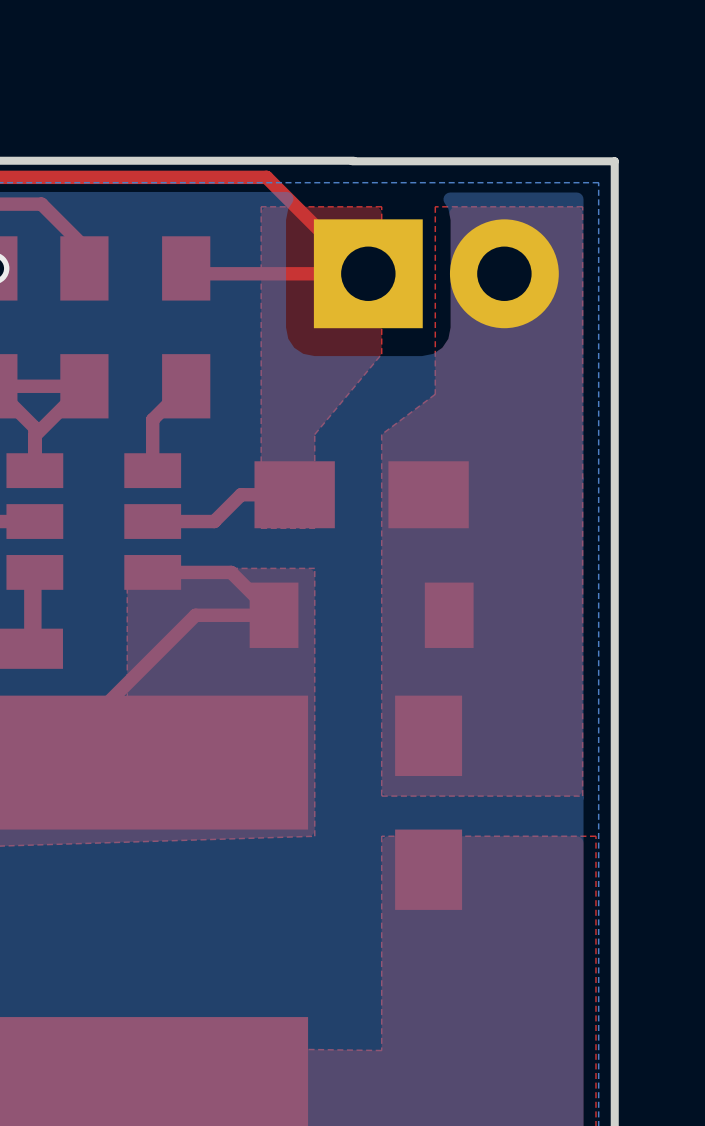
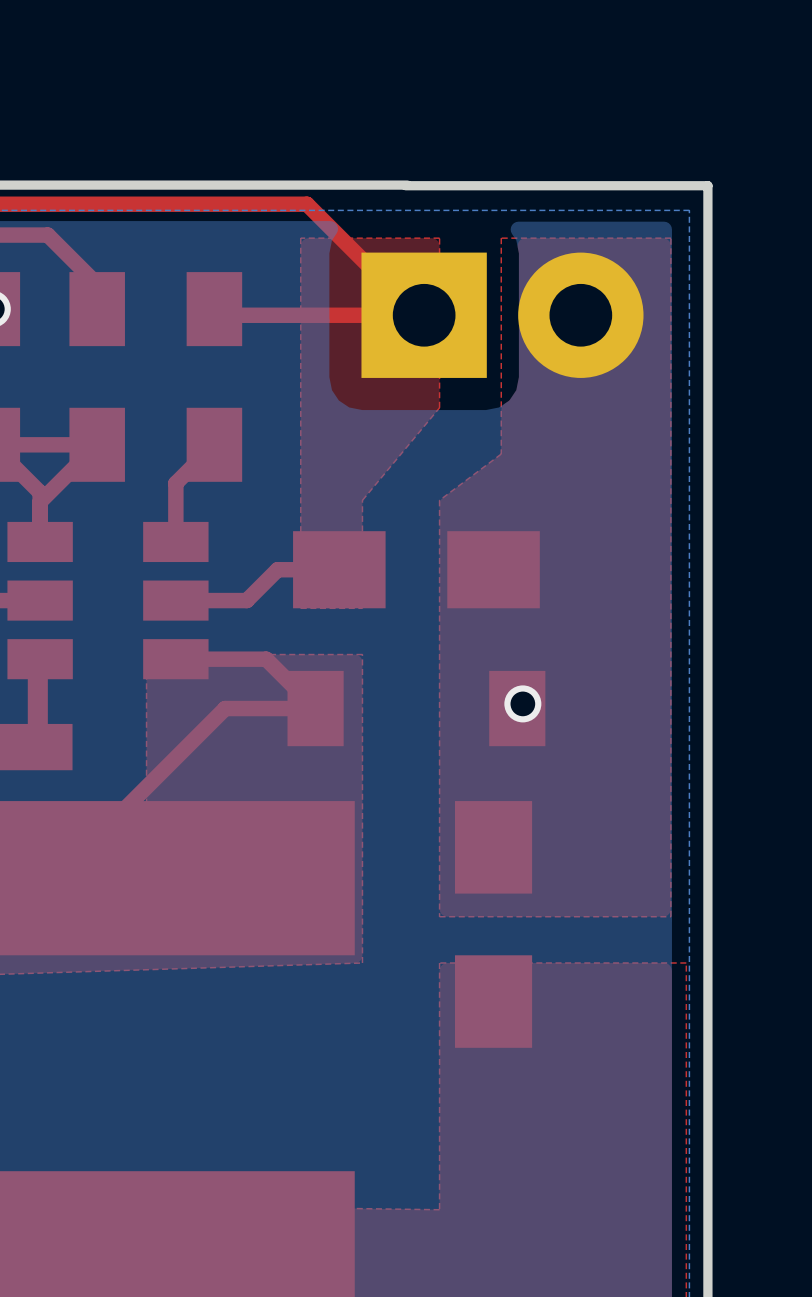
via: none -> (522, 703)

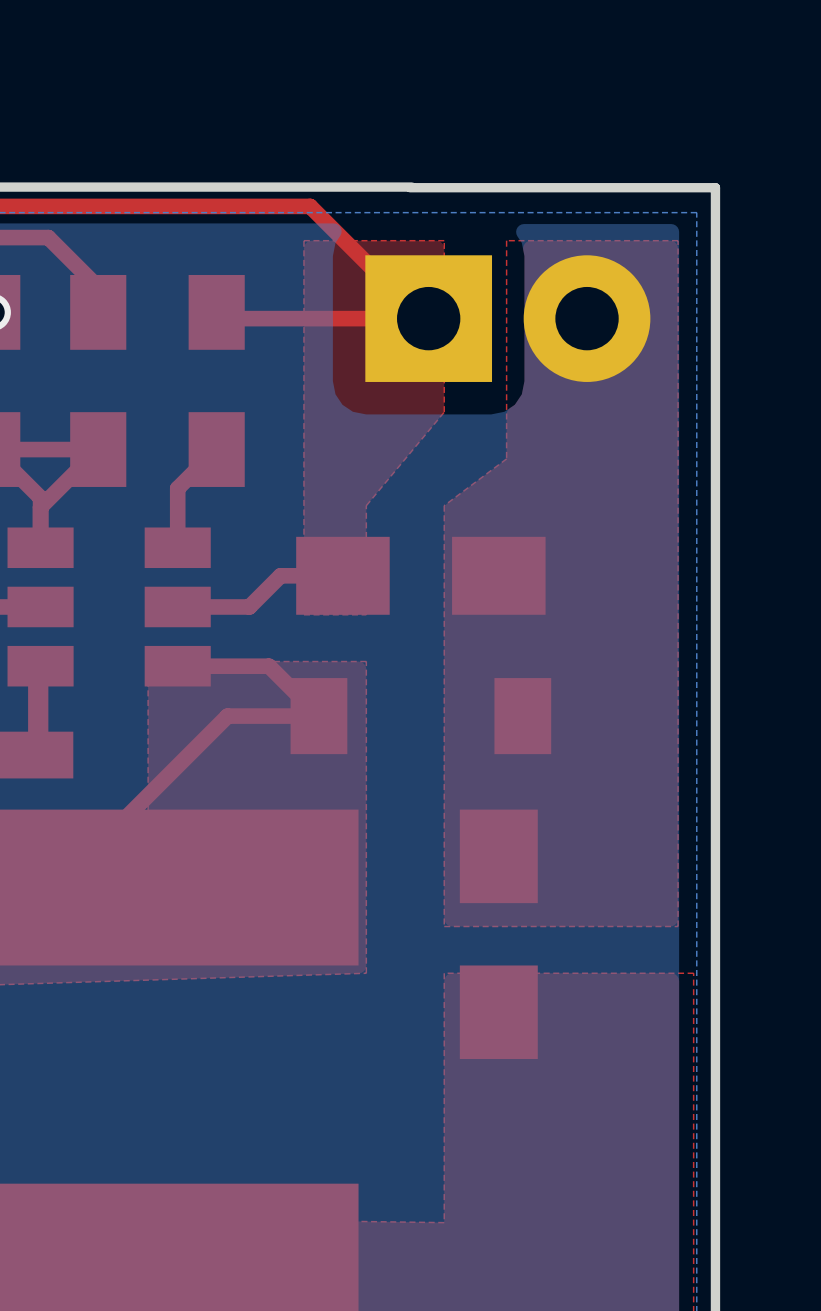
via: (522, 703) -> none

